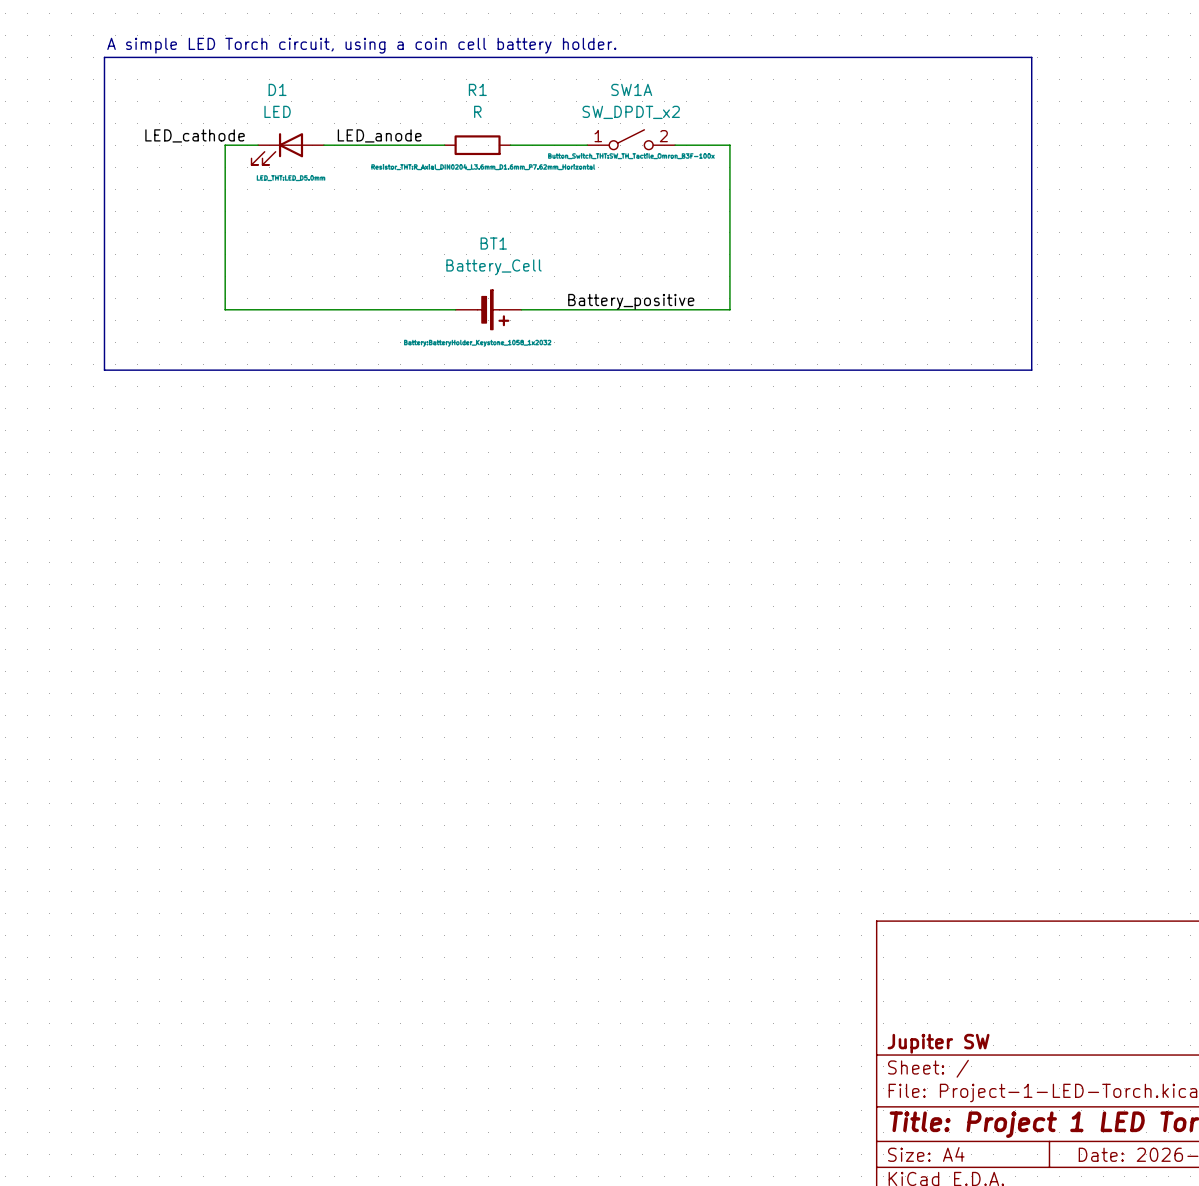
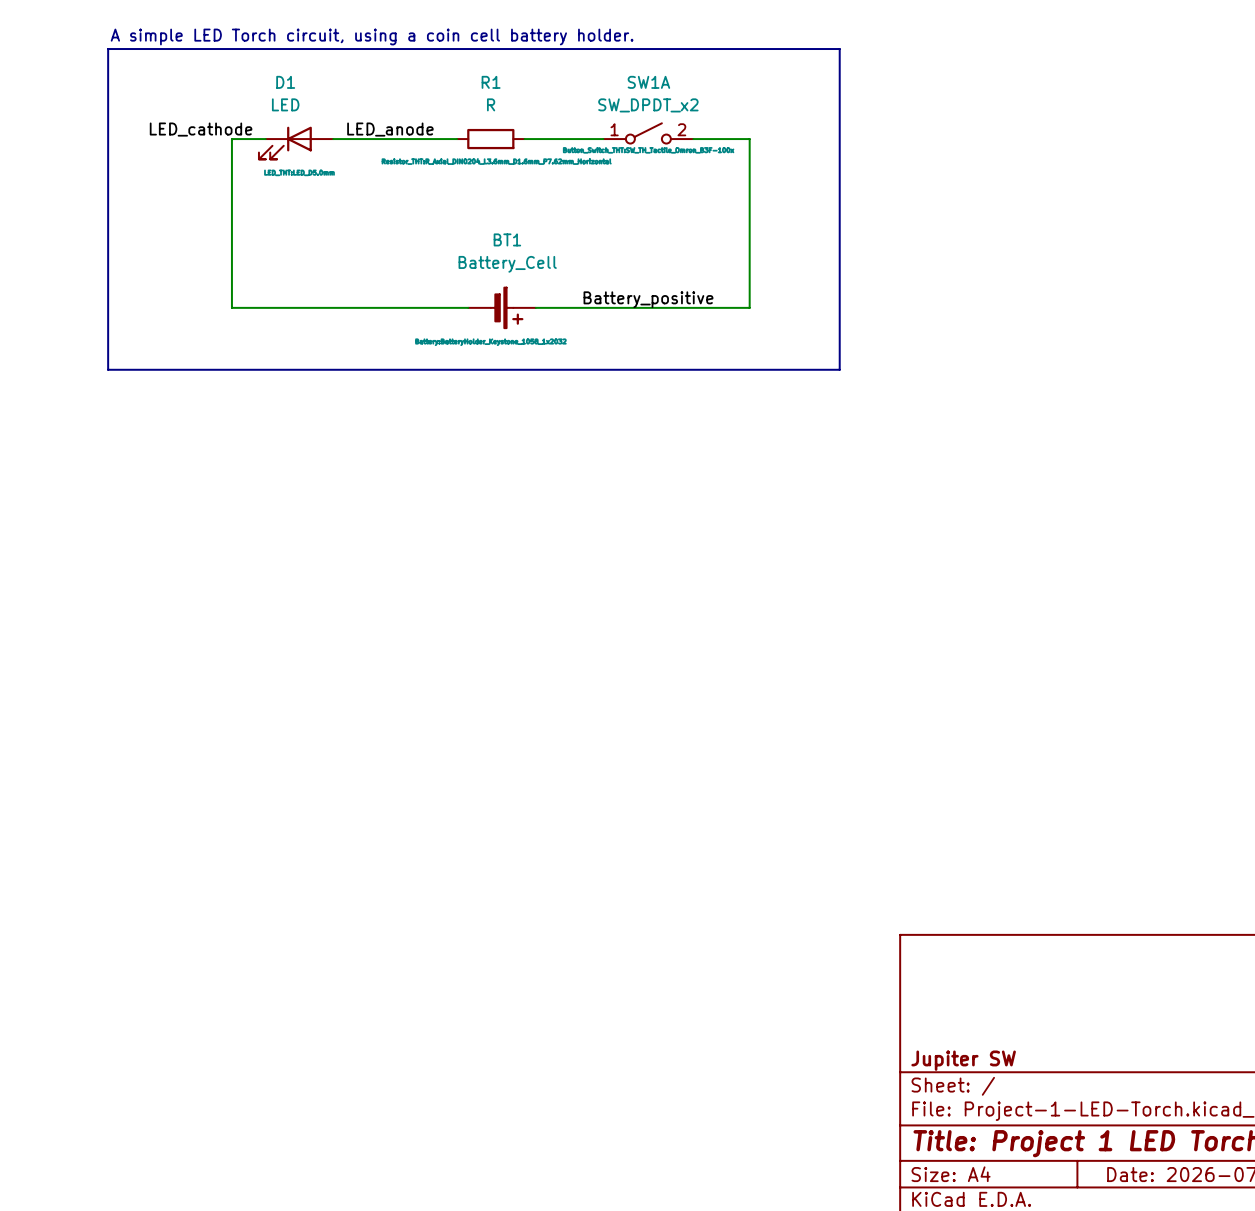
line: (817, 57) (1031, 57) (1031, 370) (817, 370) -> (839, 49) (839, 369)

